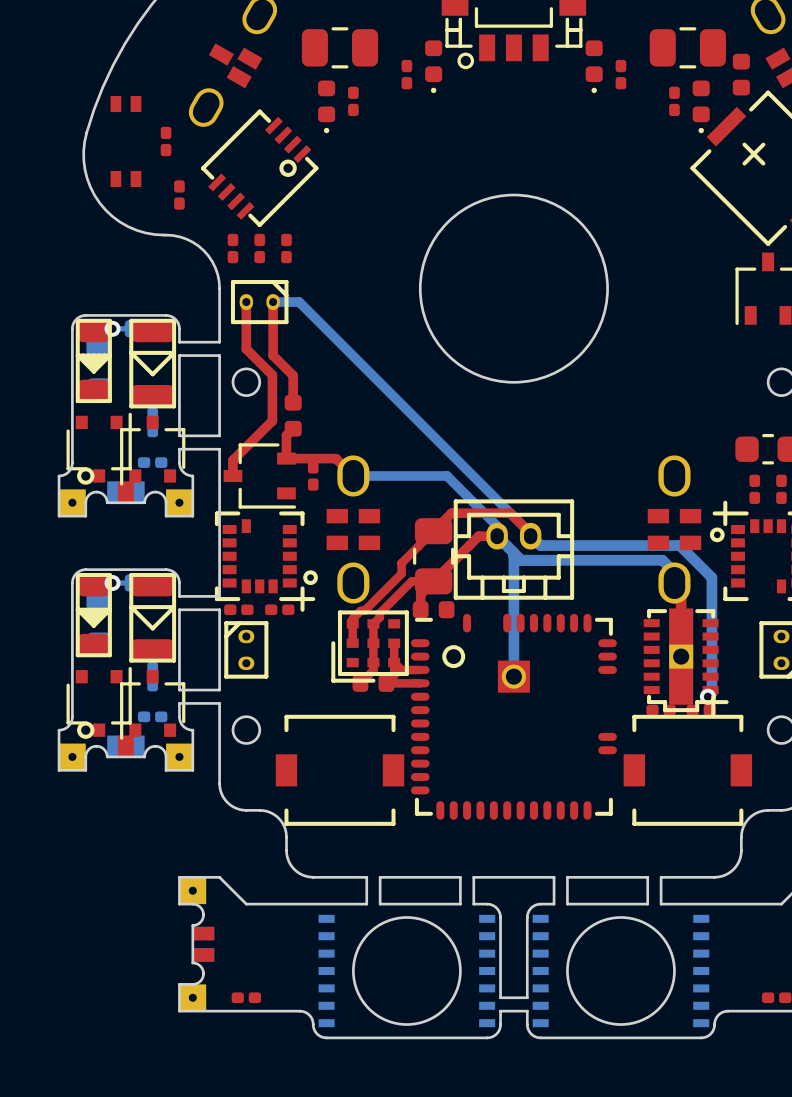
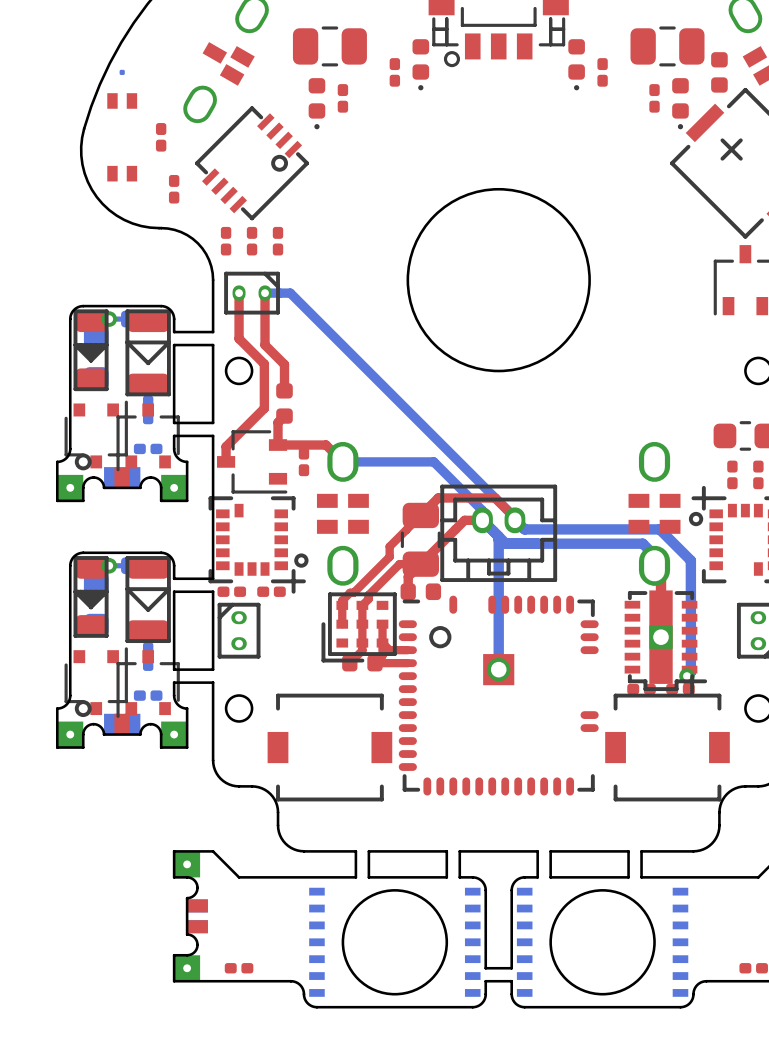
part: none -> (122, 72)
part footprint: [410, 613, 617, 820] -> [398, 595, 599, 796]

